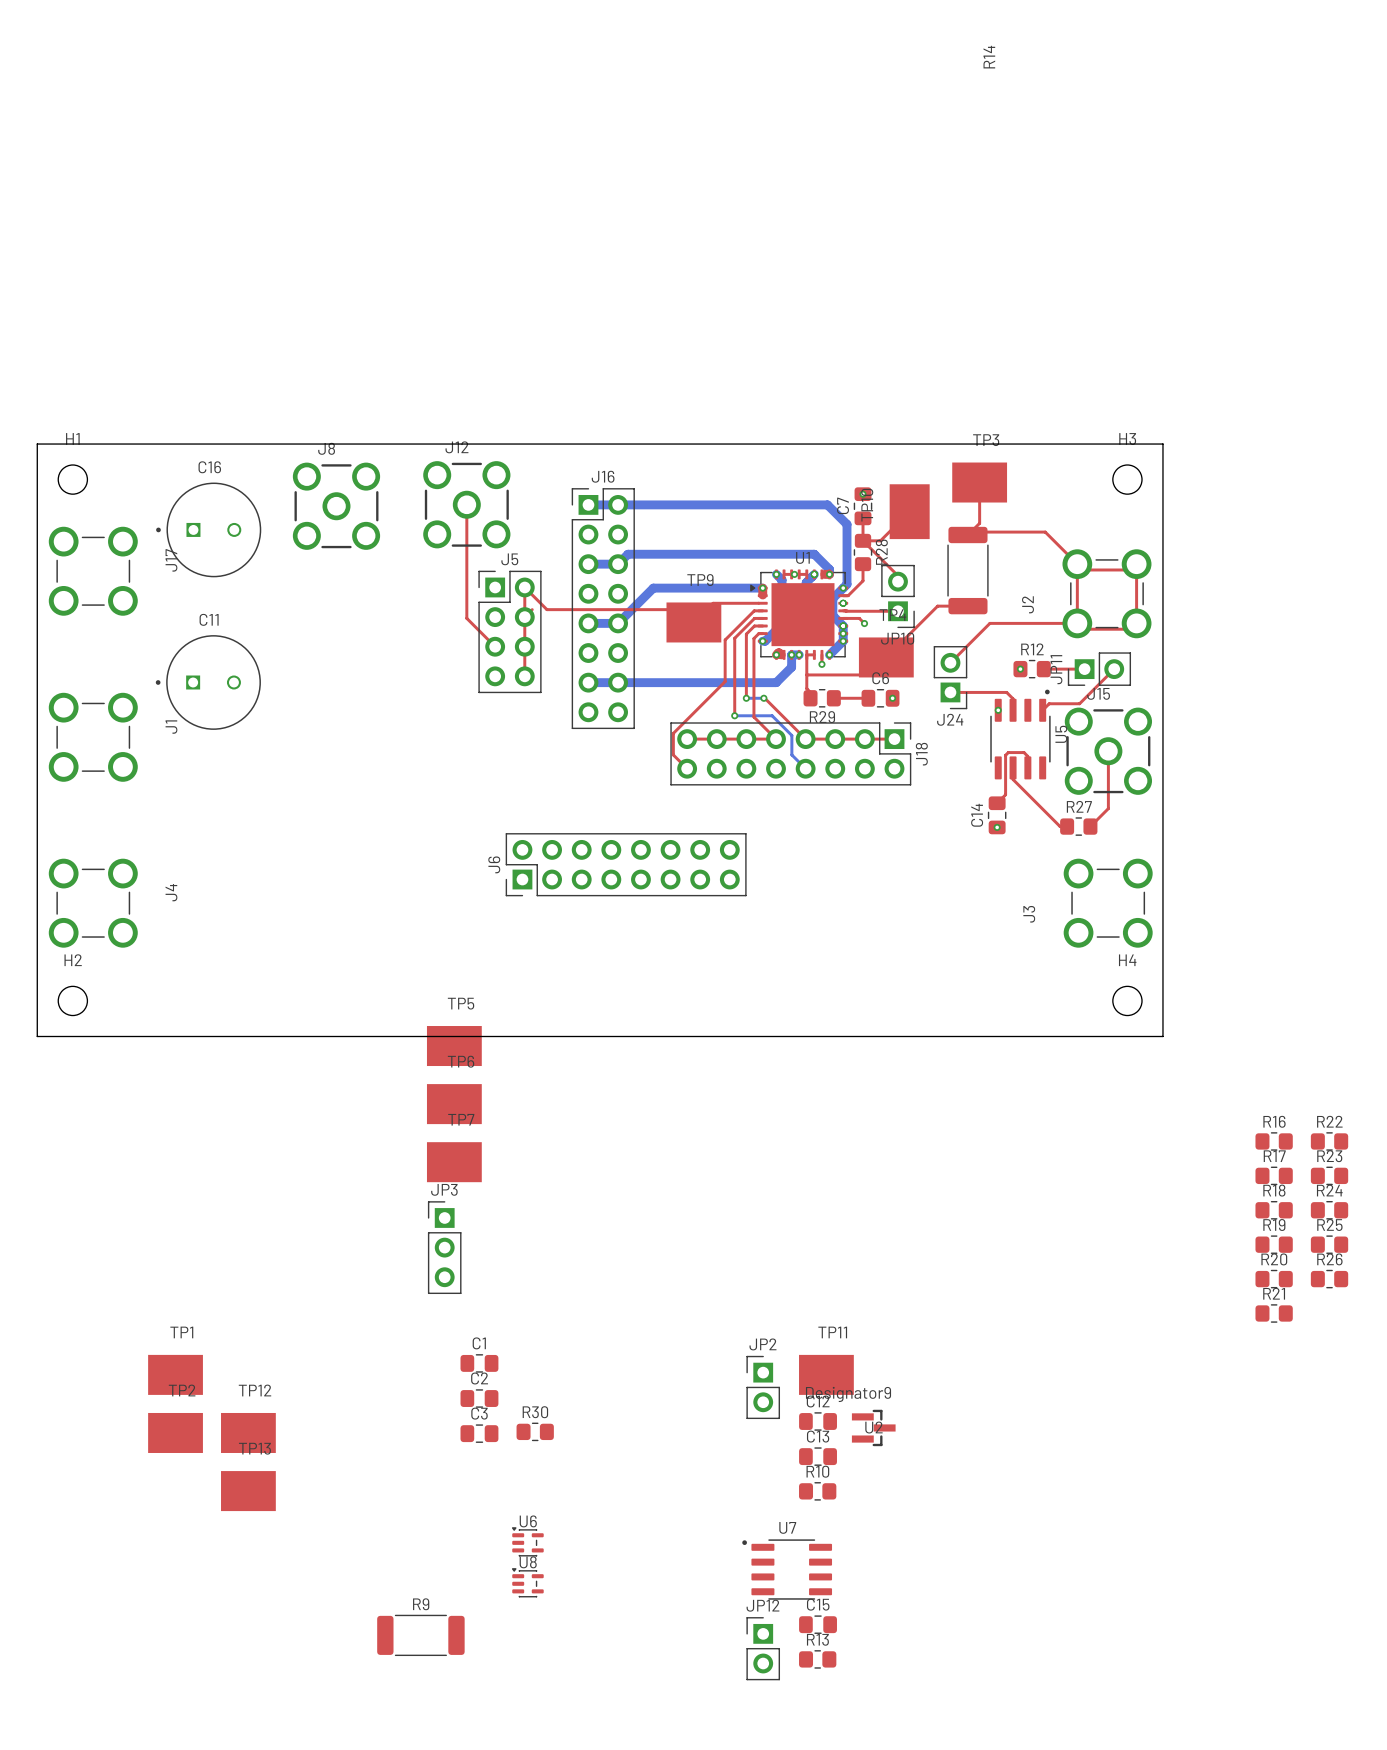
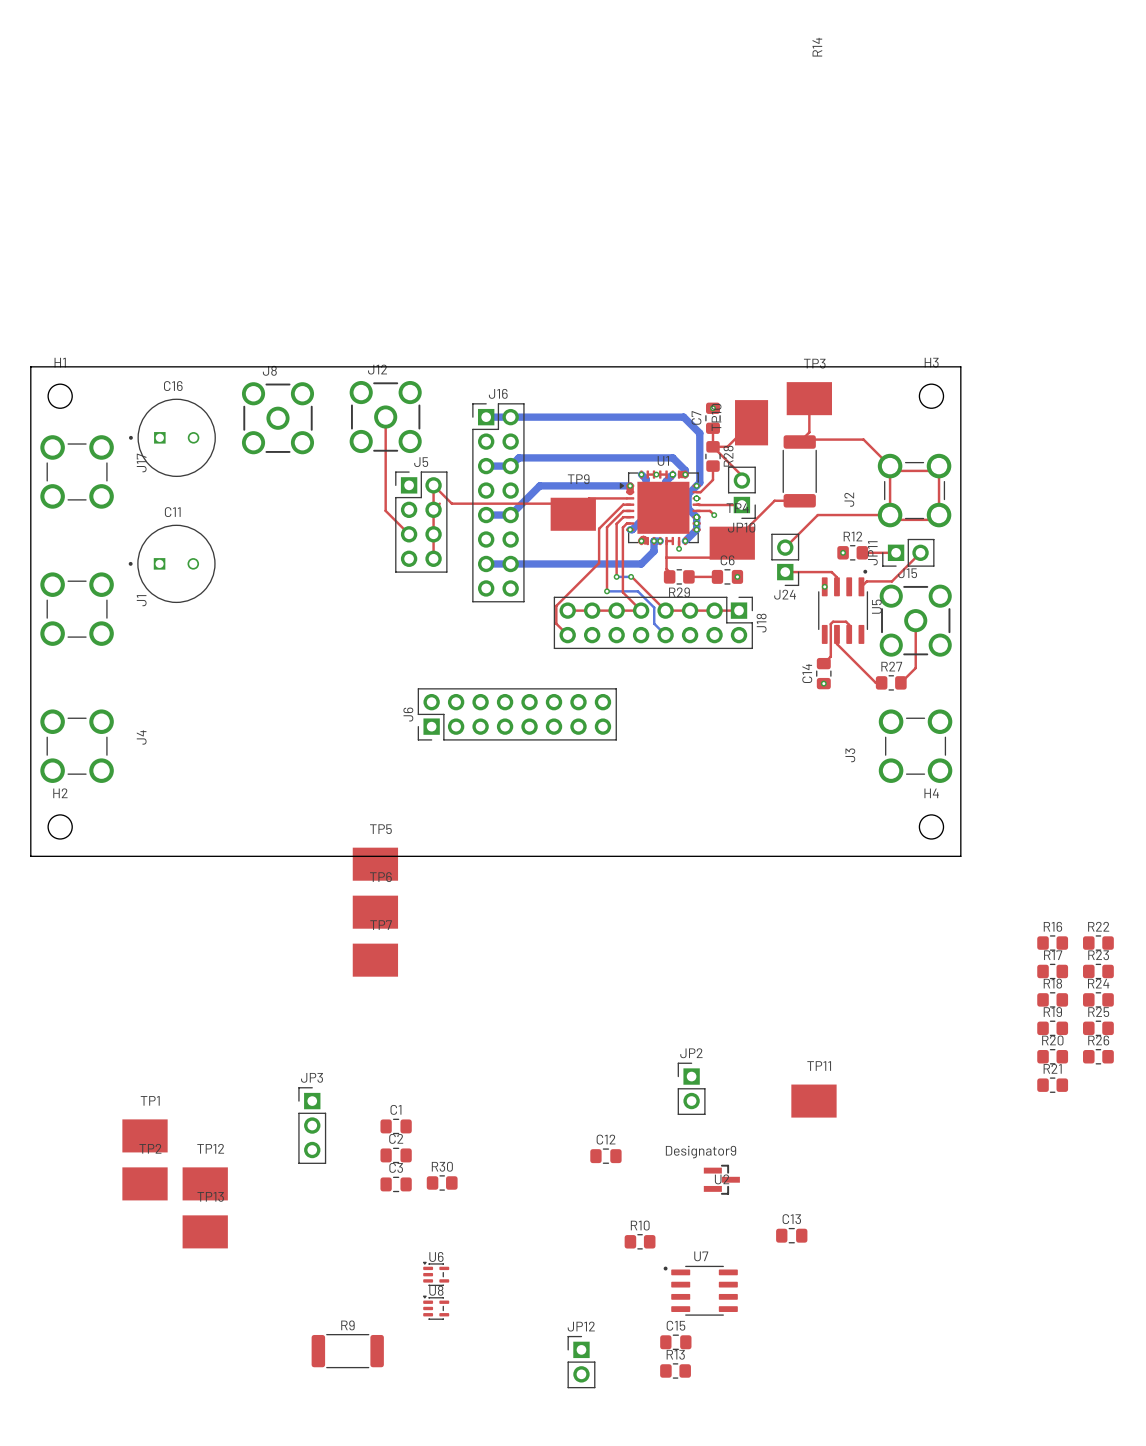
JP3 position: (444, 1247) -> (312, 1125)
TP11 position: (826, 1374) -> (813, 1101)
JP2 position: (763, 1387) -> (691, 1088)
C12 position: (818, 1421) -> (605, 1156)
C13 position: (818, 1456) -> (791, 1235)
R10 position: (817, 1491) -> (640, 1241)
U7 position: (787, 1569) -> (700, 1290)
JP12 position: (763, 1648) -> (581, 1362)

